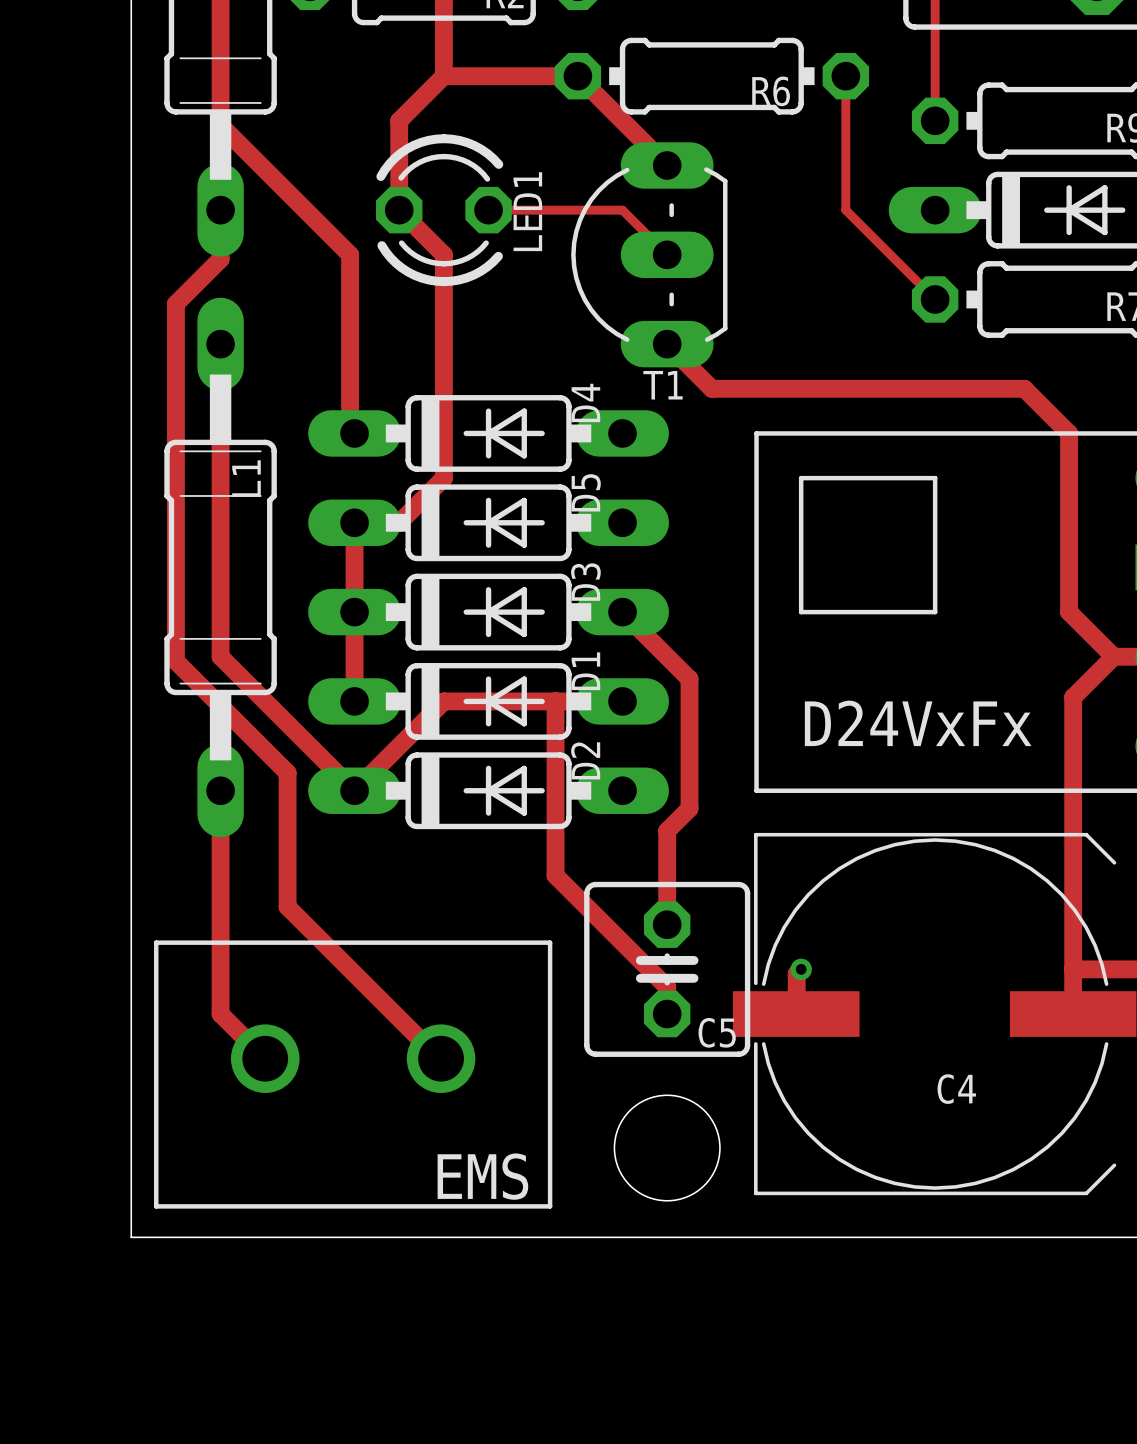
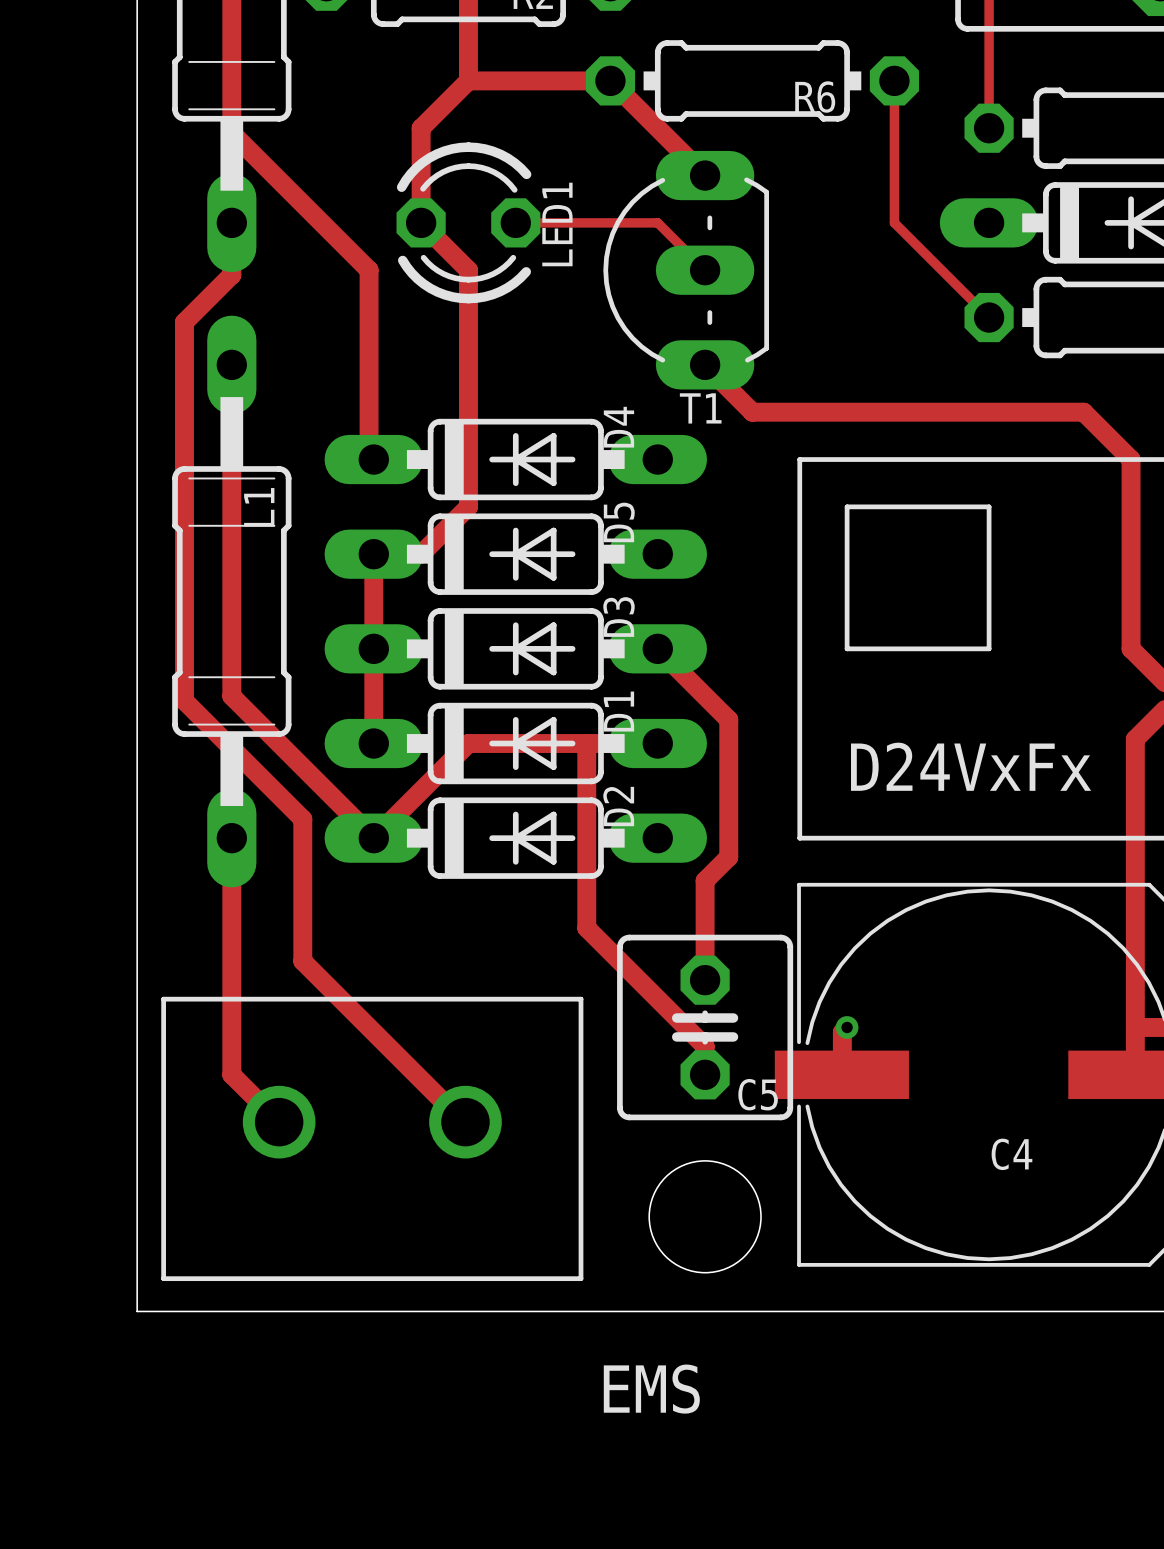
EMS name position: EMS (482, 1176) -> EMS (651, 1389)

